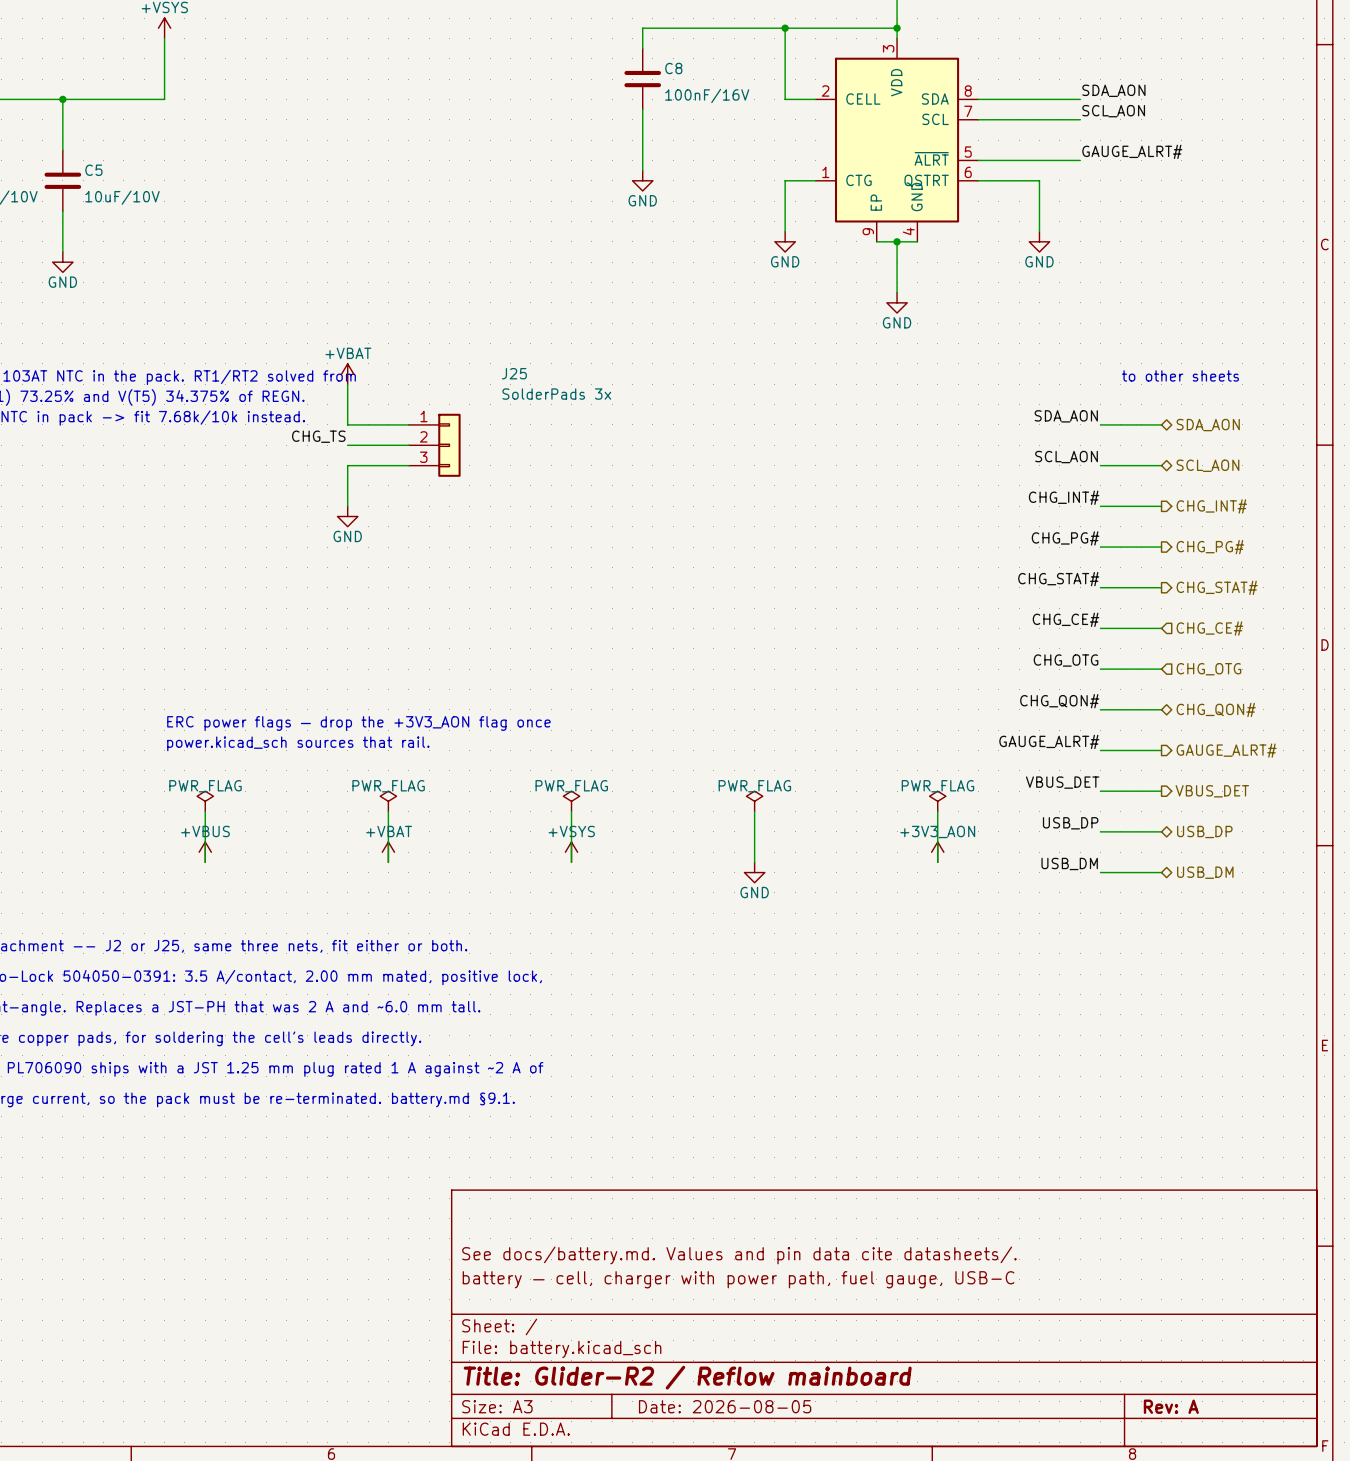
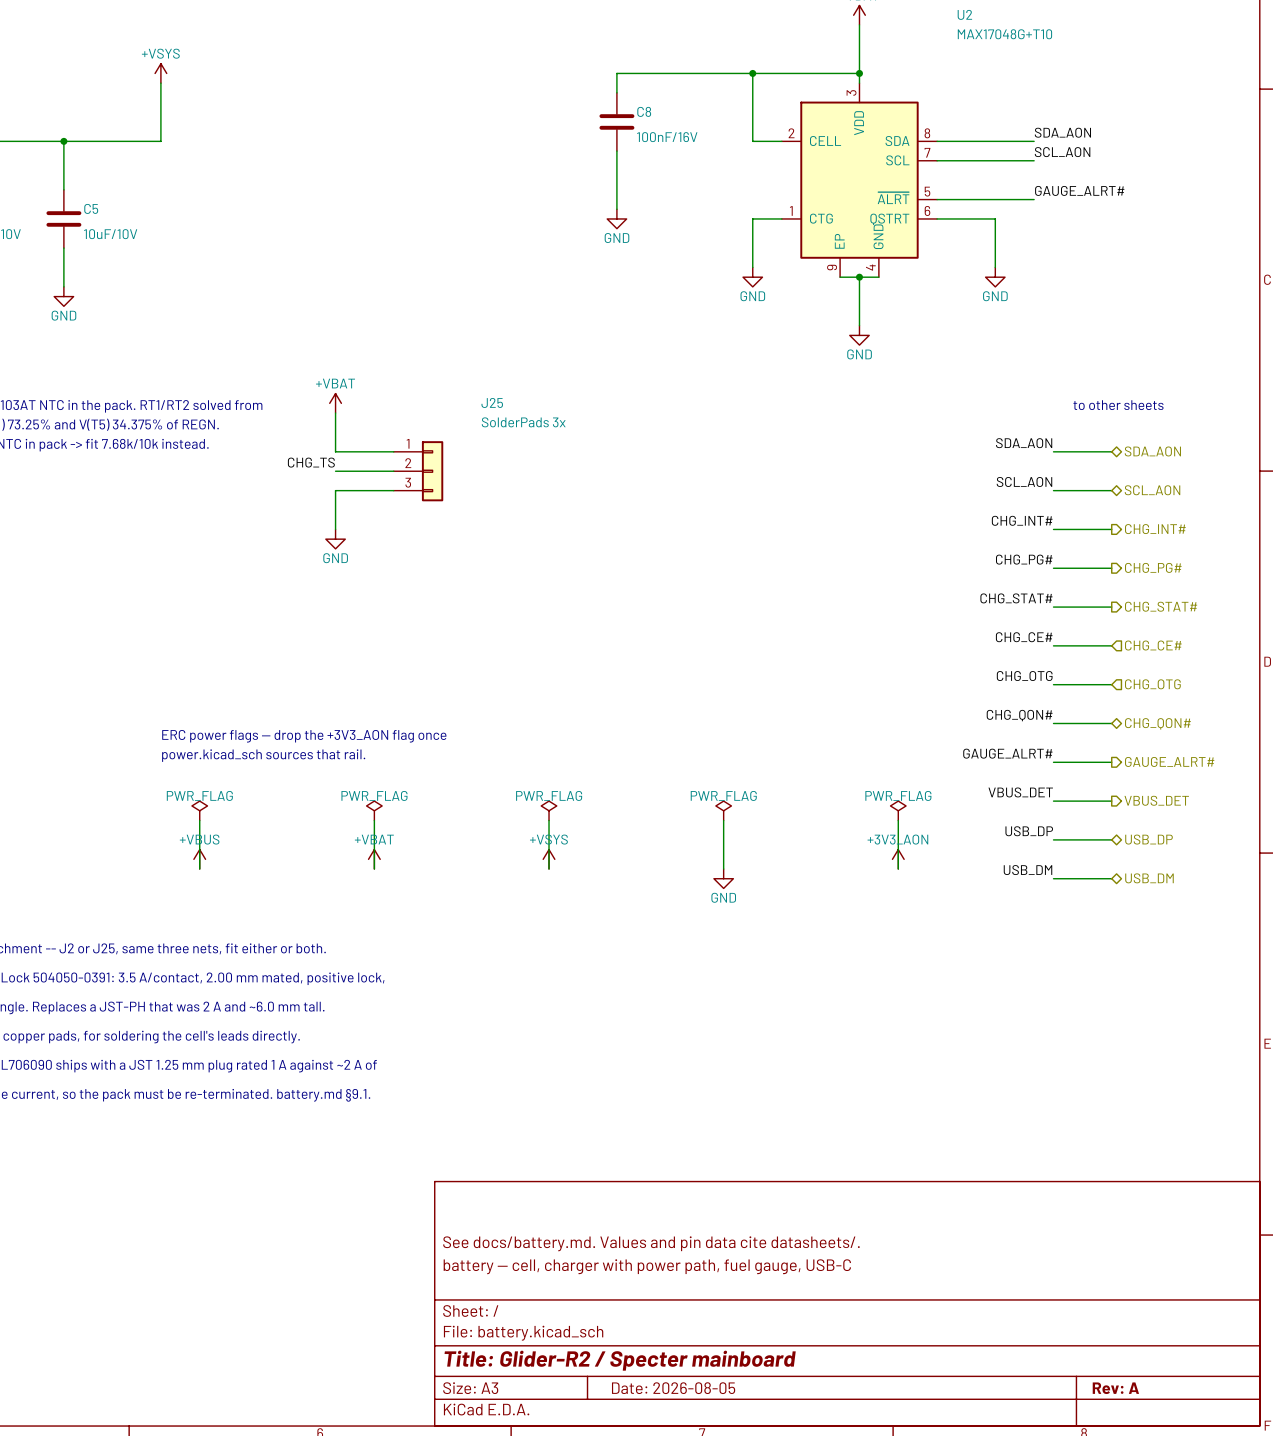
title block: Title: Glider-R2 / Reflow mainboard (687, 1377) -> Title: Glider-R2 / Specter mainboard (620, 1360)

